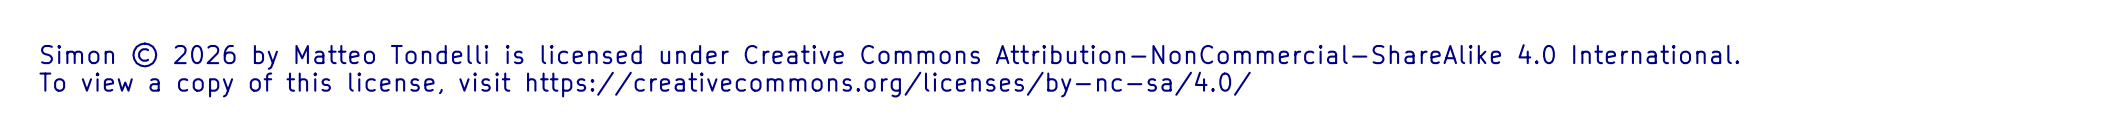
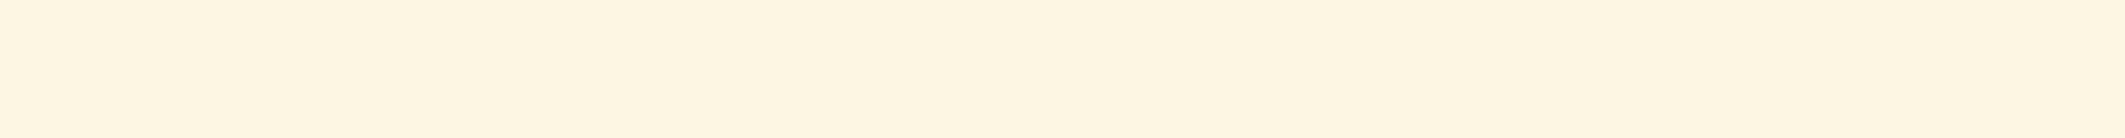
text: Simon © 2026 by Matteo Tondelli is licensed under Creative Commons Attribution-NonCommercial-ShareAlike 4.0 International. (890, 56) -> none
text: To view a copy of this license, visit https://creativecommons.org/licenses/by-nc-sa/4.0/ (645, 84) -> none

